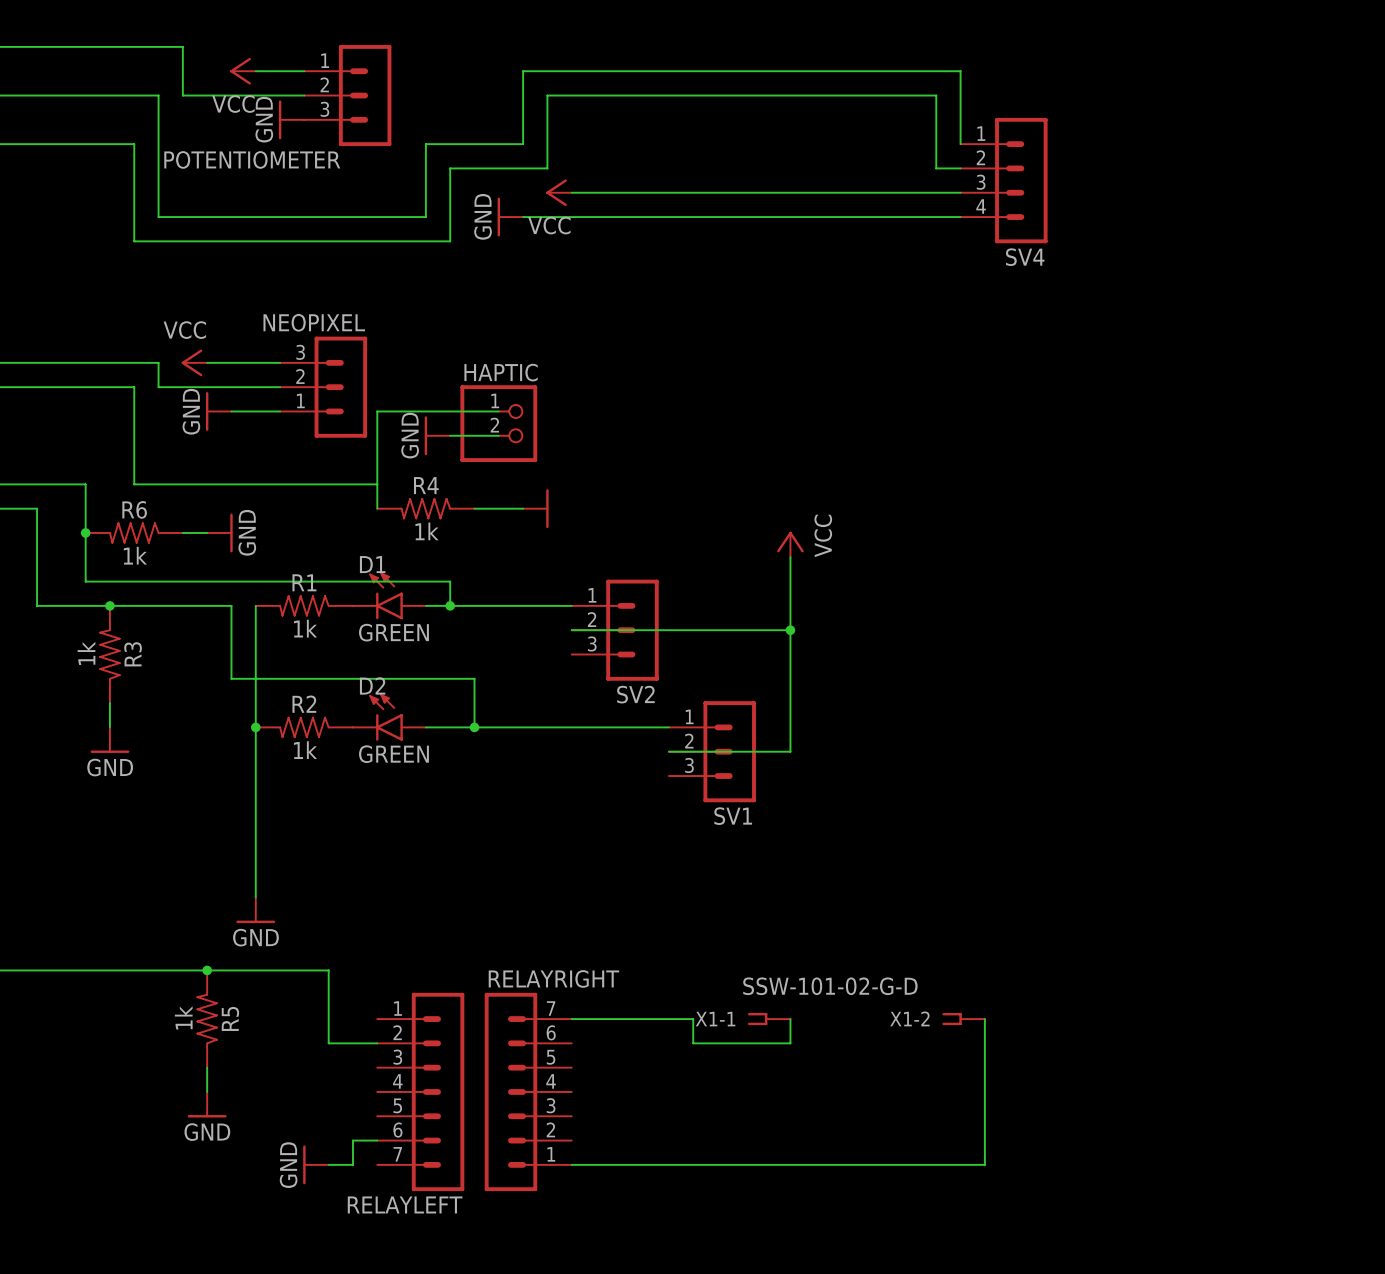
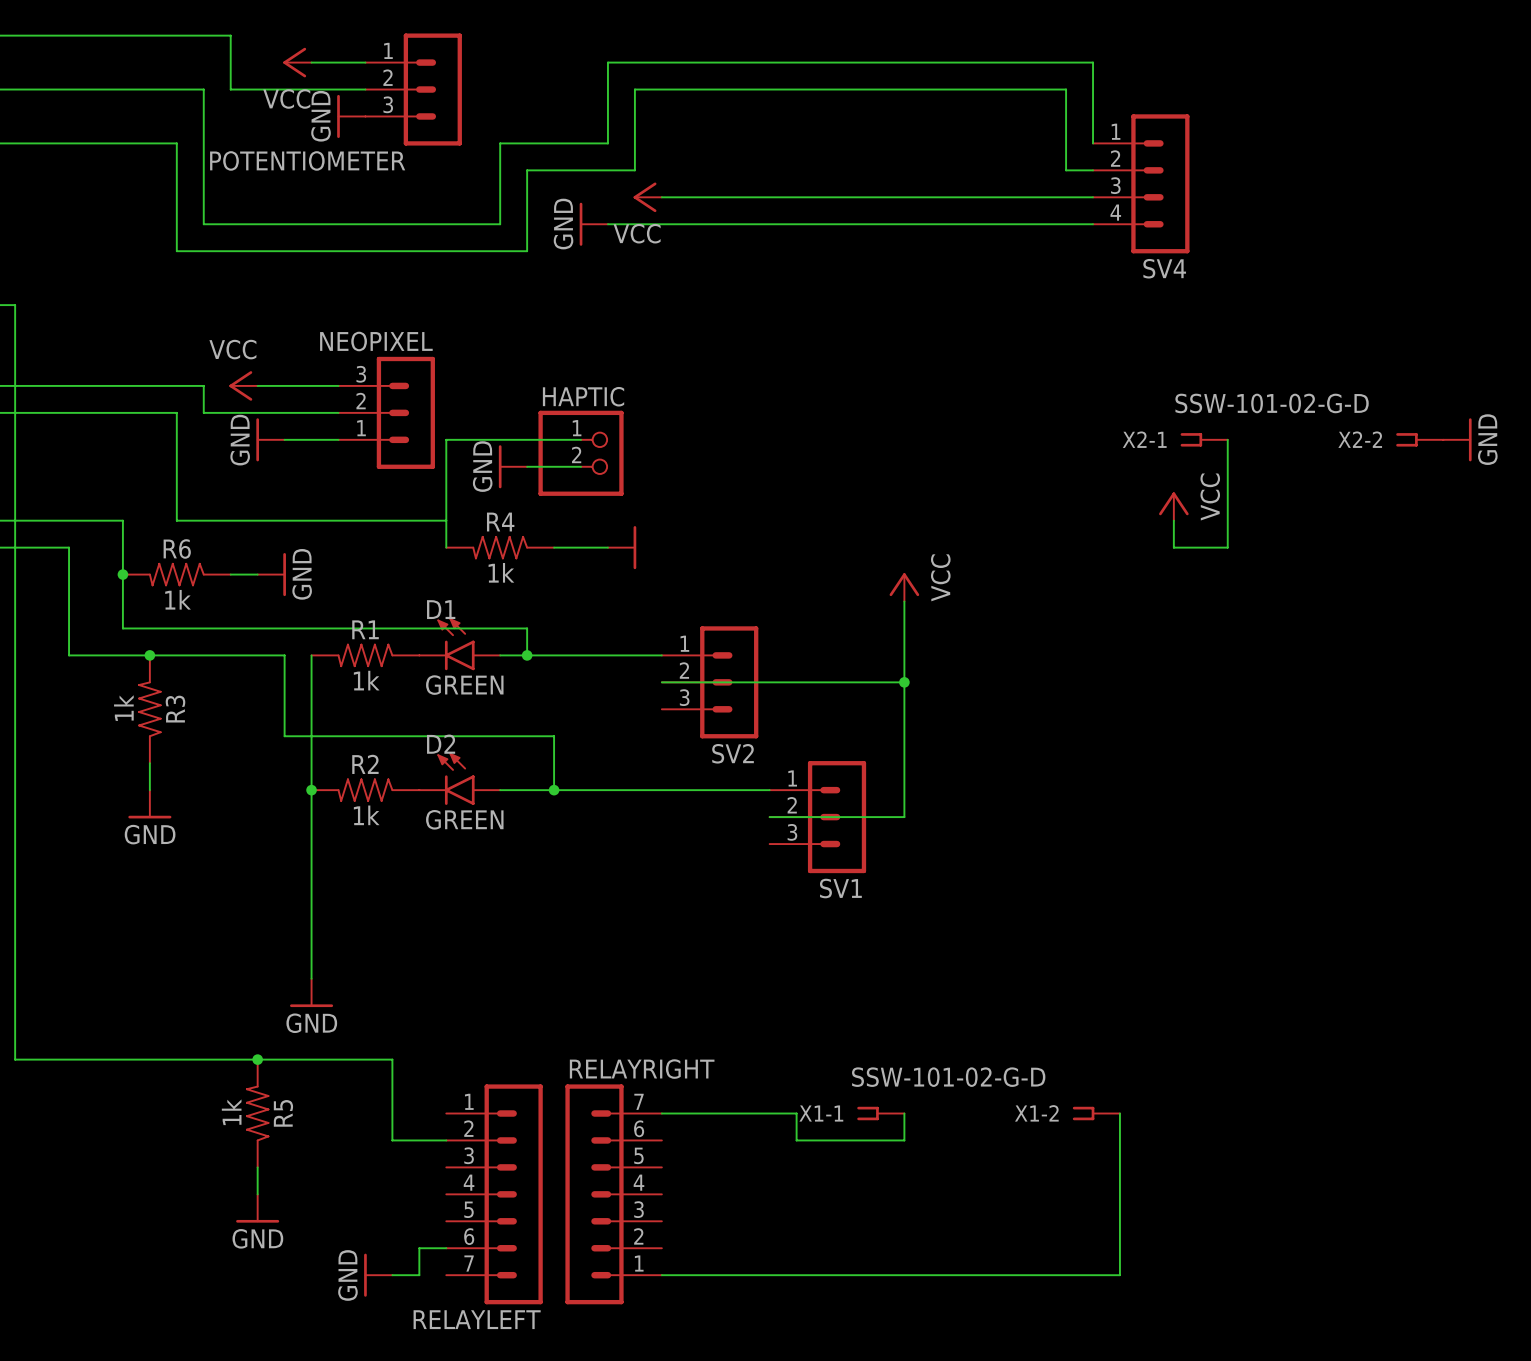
X2-1: none -> SSW-101-02-G-D (1204, 439)
wire: none -> (1227, 439) (1227, 547) (1173, 547) (1173, 520)
X2-2: none -> (1419, 439)
power symbol: none -> GND (1457, 439)
power symbol: none -> VCC (1173, 506)

